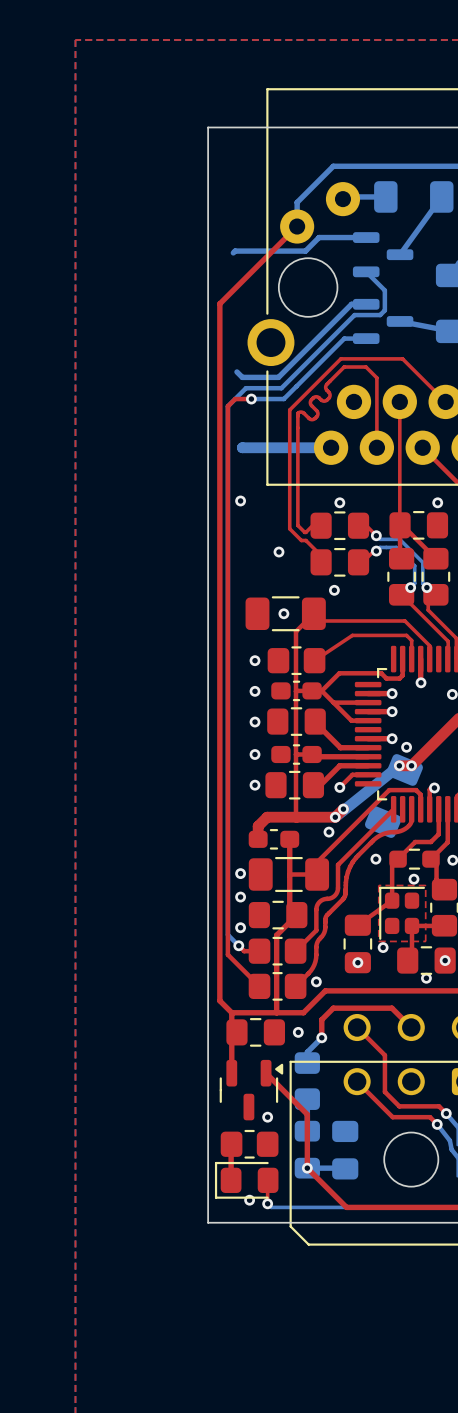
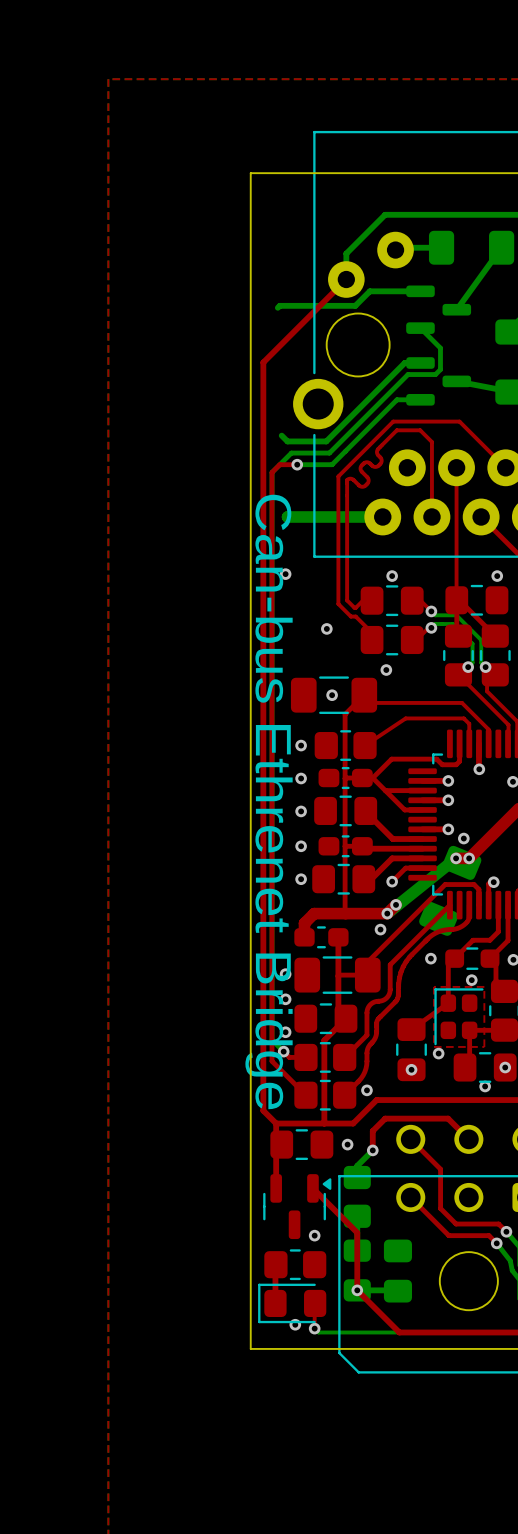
text: none -> Can-bus Ethrenet Bridge (269, 801)

